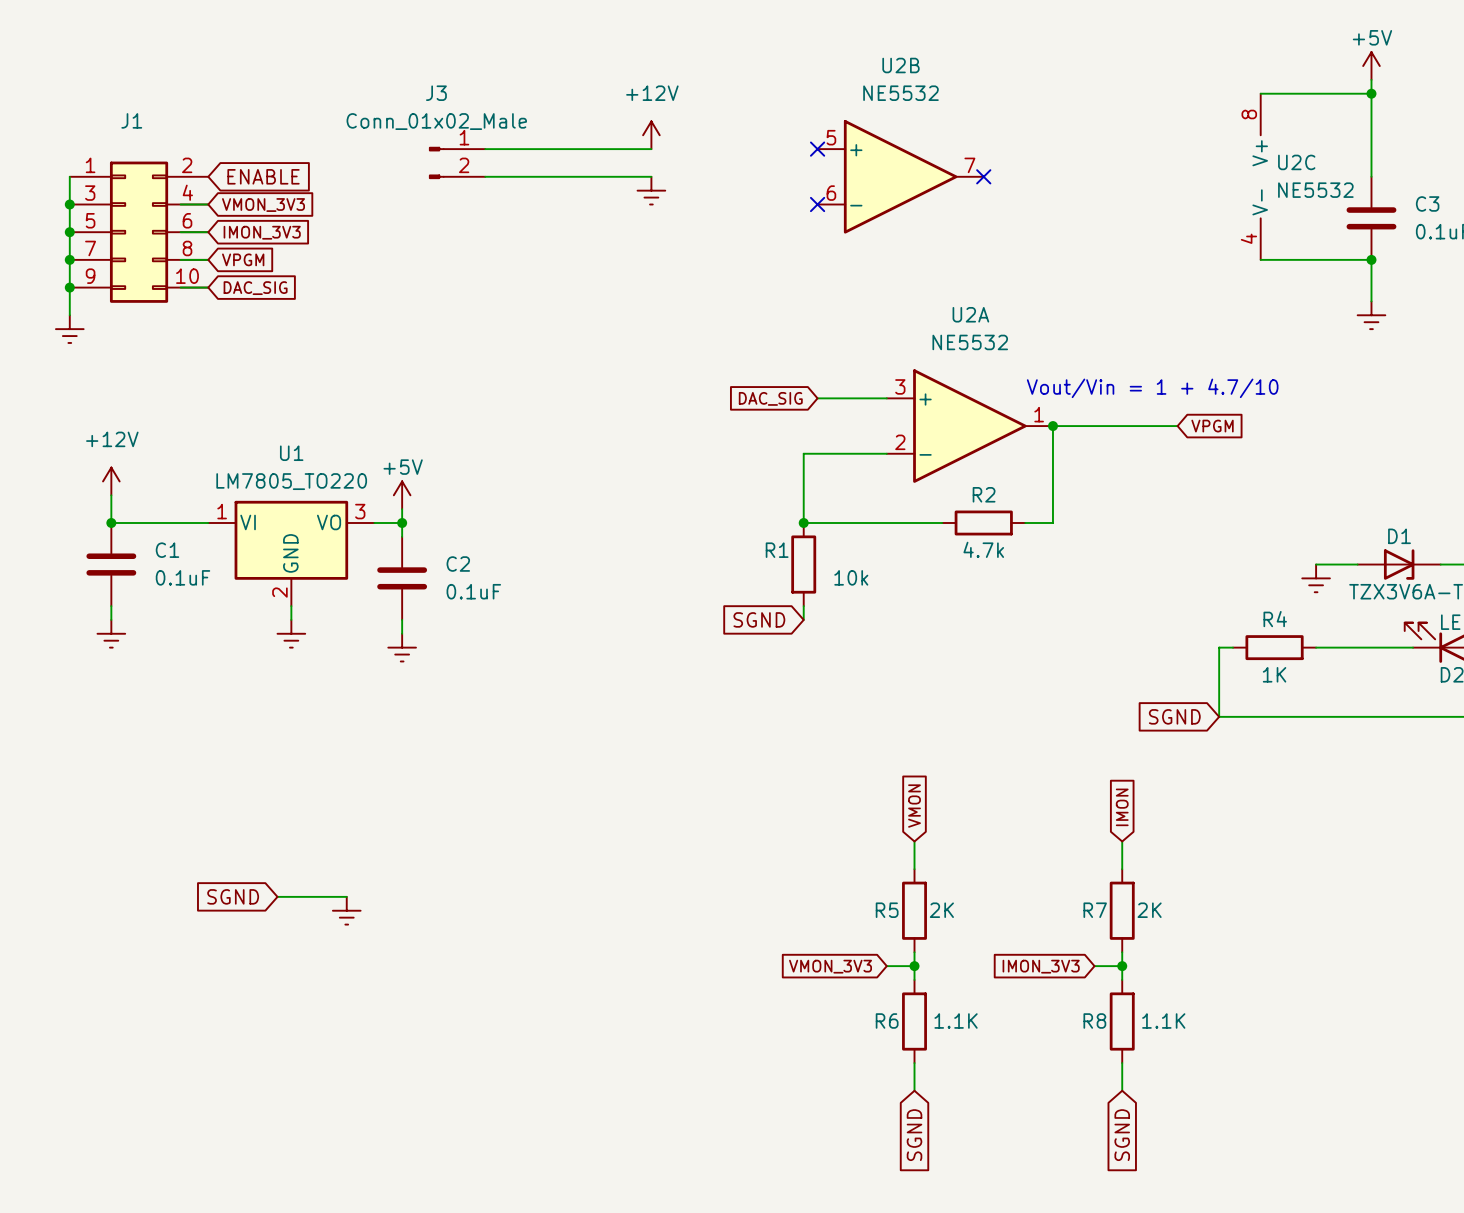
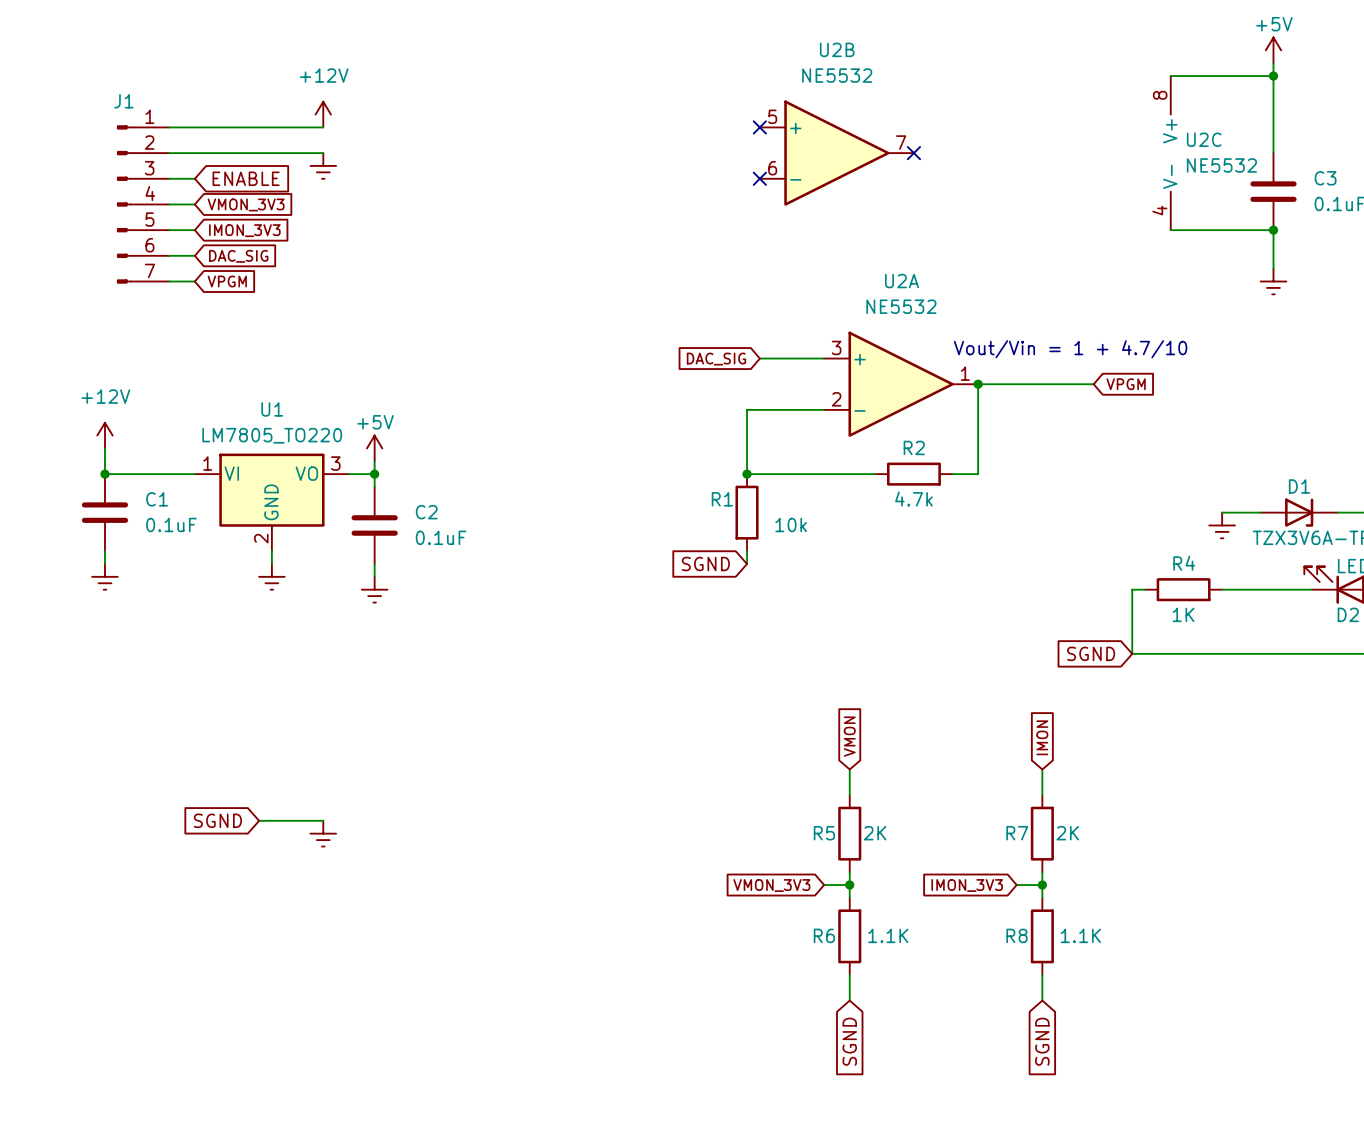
power symbol: none -> +12V (323, 114)
power symbol: +12V (651, 135) -> none
wire: none -> (169, 127) (323, 127)
wire: (485, 149) (651, 149) -> none
J1 symbol: [69, 161, 209, 303] -> [117, 125, 170, 284]
J3: Conn_01x02_Male (457, 162) -> none
wire: (69, 176) (69, 315) -> none
wire: none -> (169, 153) (323, 153)
global label: ENABLE (263, 176) -> none
wire: (485, 176) (651, 176) -> none
power symbol: none -> (323, 165)
power symbol: (651, 190) -> none
junction: (69, 204) -> none
global label: VMON_3V3 (263, 205) -> ENABLE (246, 178)
junction: (69, 232) -> none
global label: IMON_3V3 (262, 232) -> VMON_3V3 (246, 204)
junction: (69, 259) -> none
global label: VPGM (243, 259) -> IMON_3V3 (244, 230)
junction: (69, 287) -> none
wire: none -> (169, 281) (194, 281)
global label: none -> VPGM (227, 281)
power symbol: (69, 329) -> none

